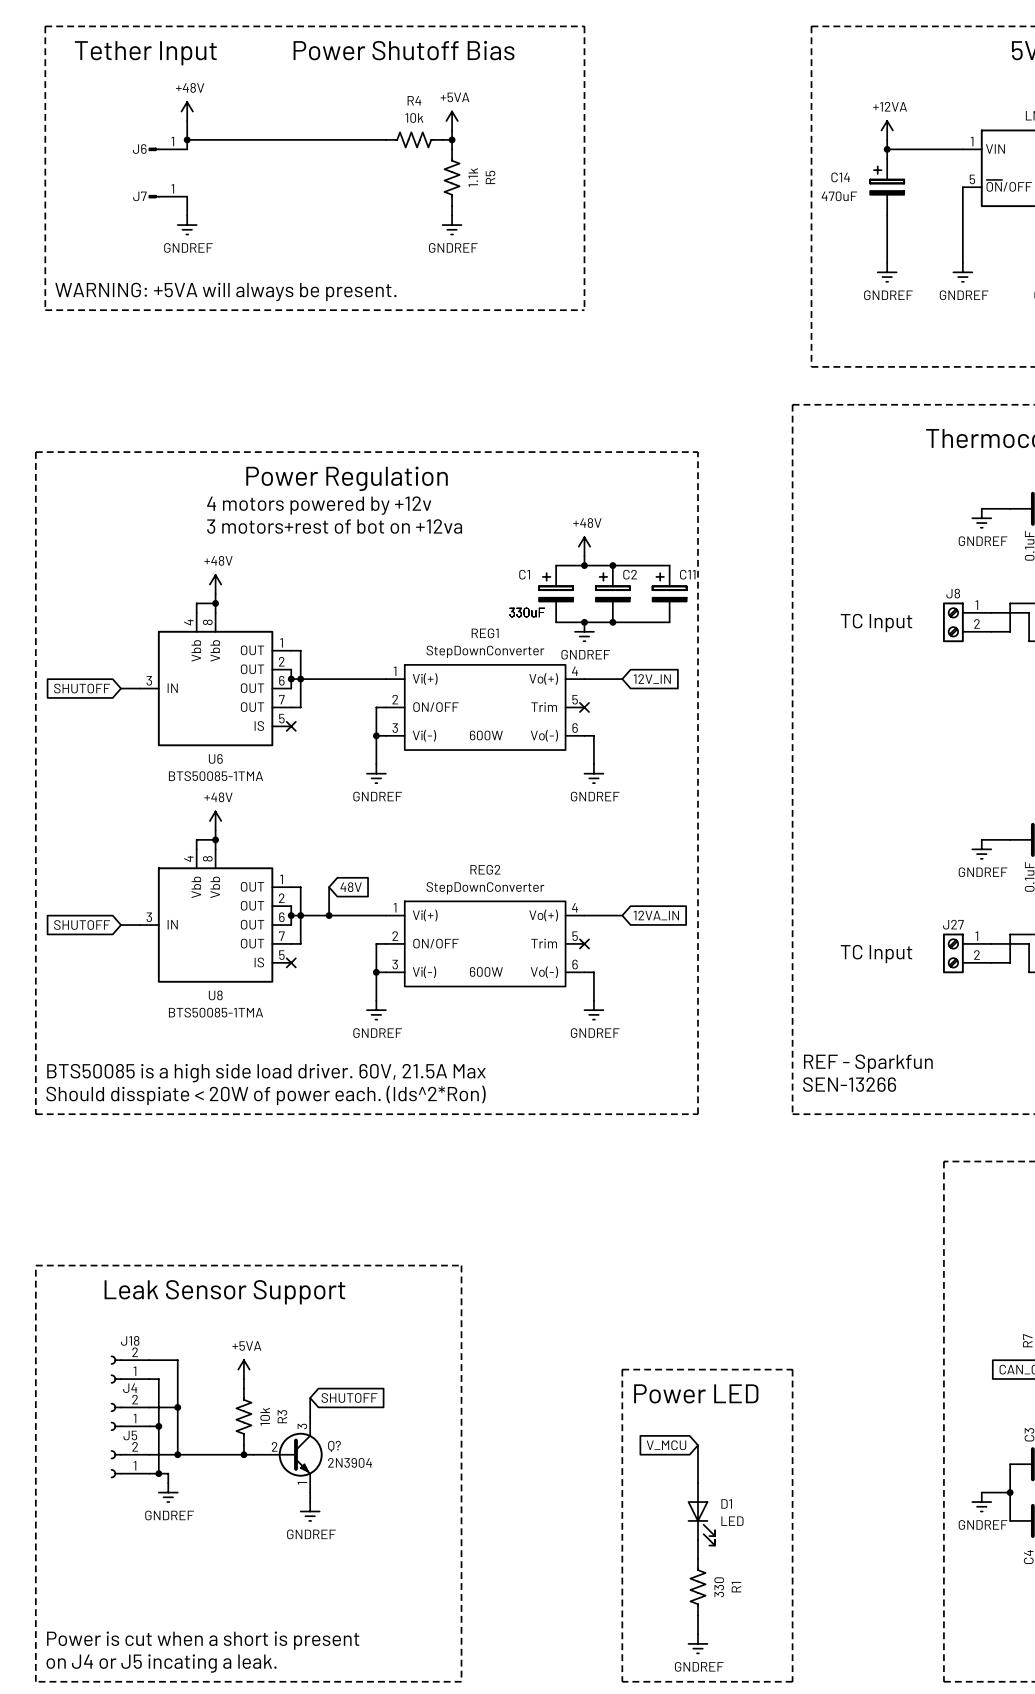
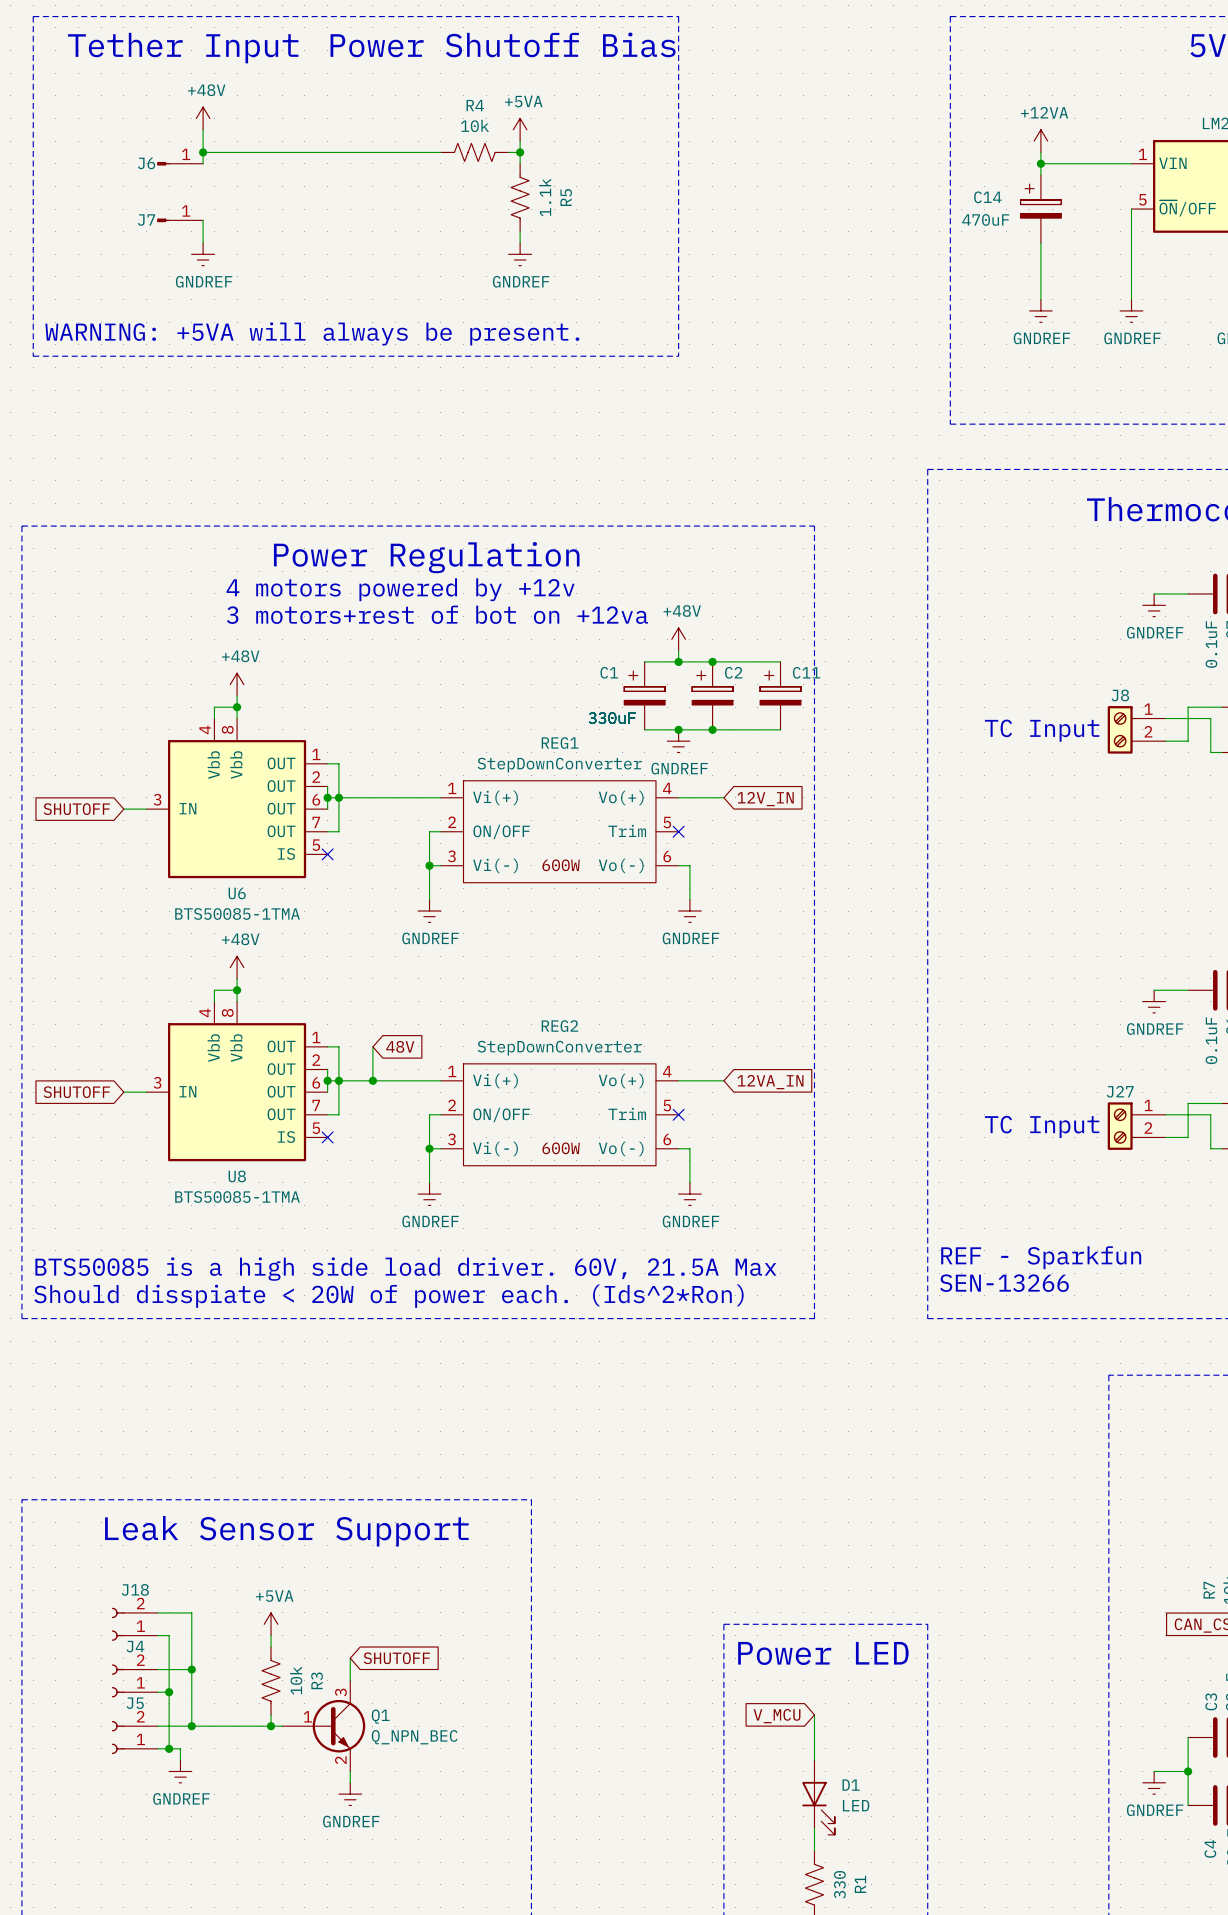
Q? pin number: 2 (274, 1446) -> 1 (307, 1716)
Q? name: Q? (334, 1446) -> Q1 (380, 1716)
Q? value: 2N3904 (350, 1462) -> Q_NPN_BEC (414, 1737)
Q? pin number: 1 (302, 1483) -> 2 (340, 1760)

